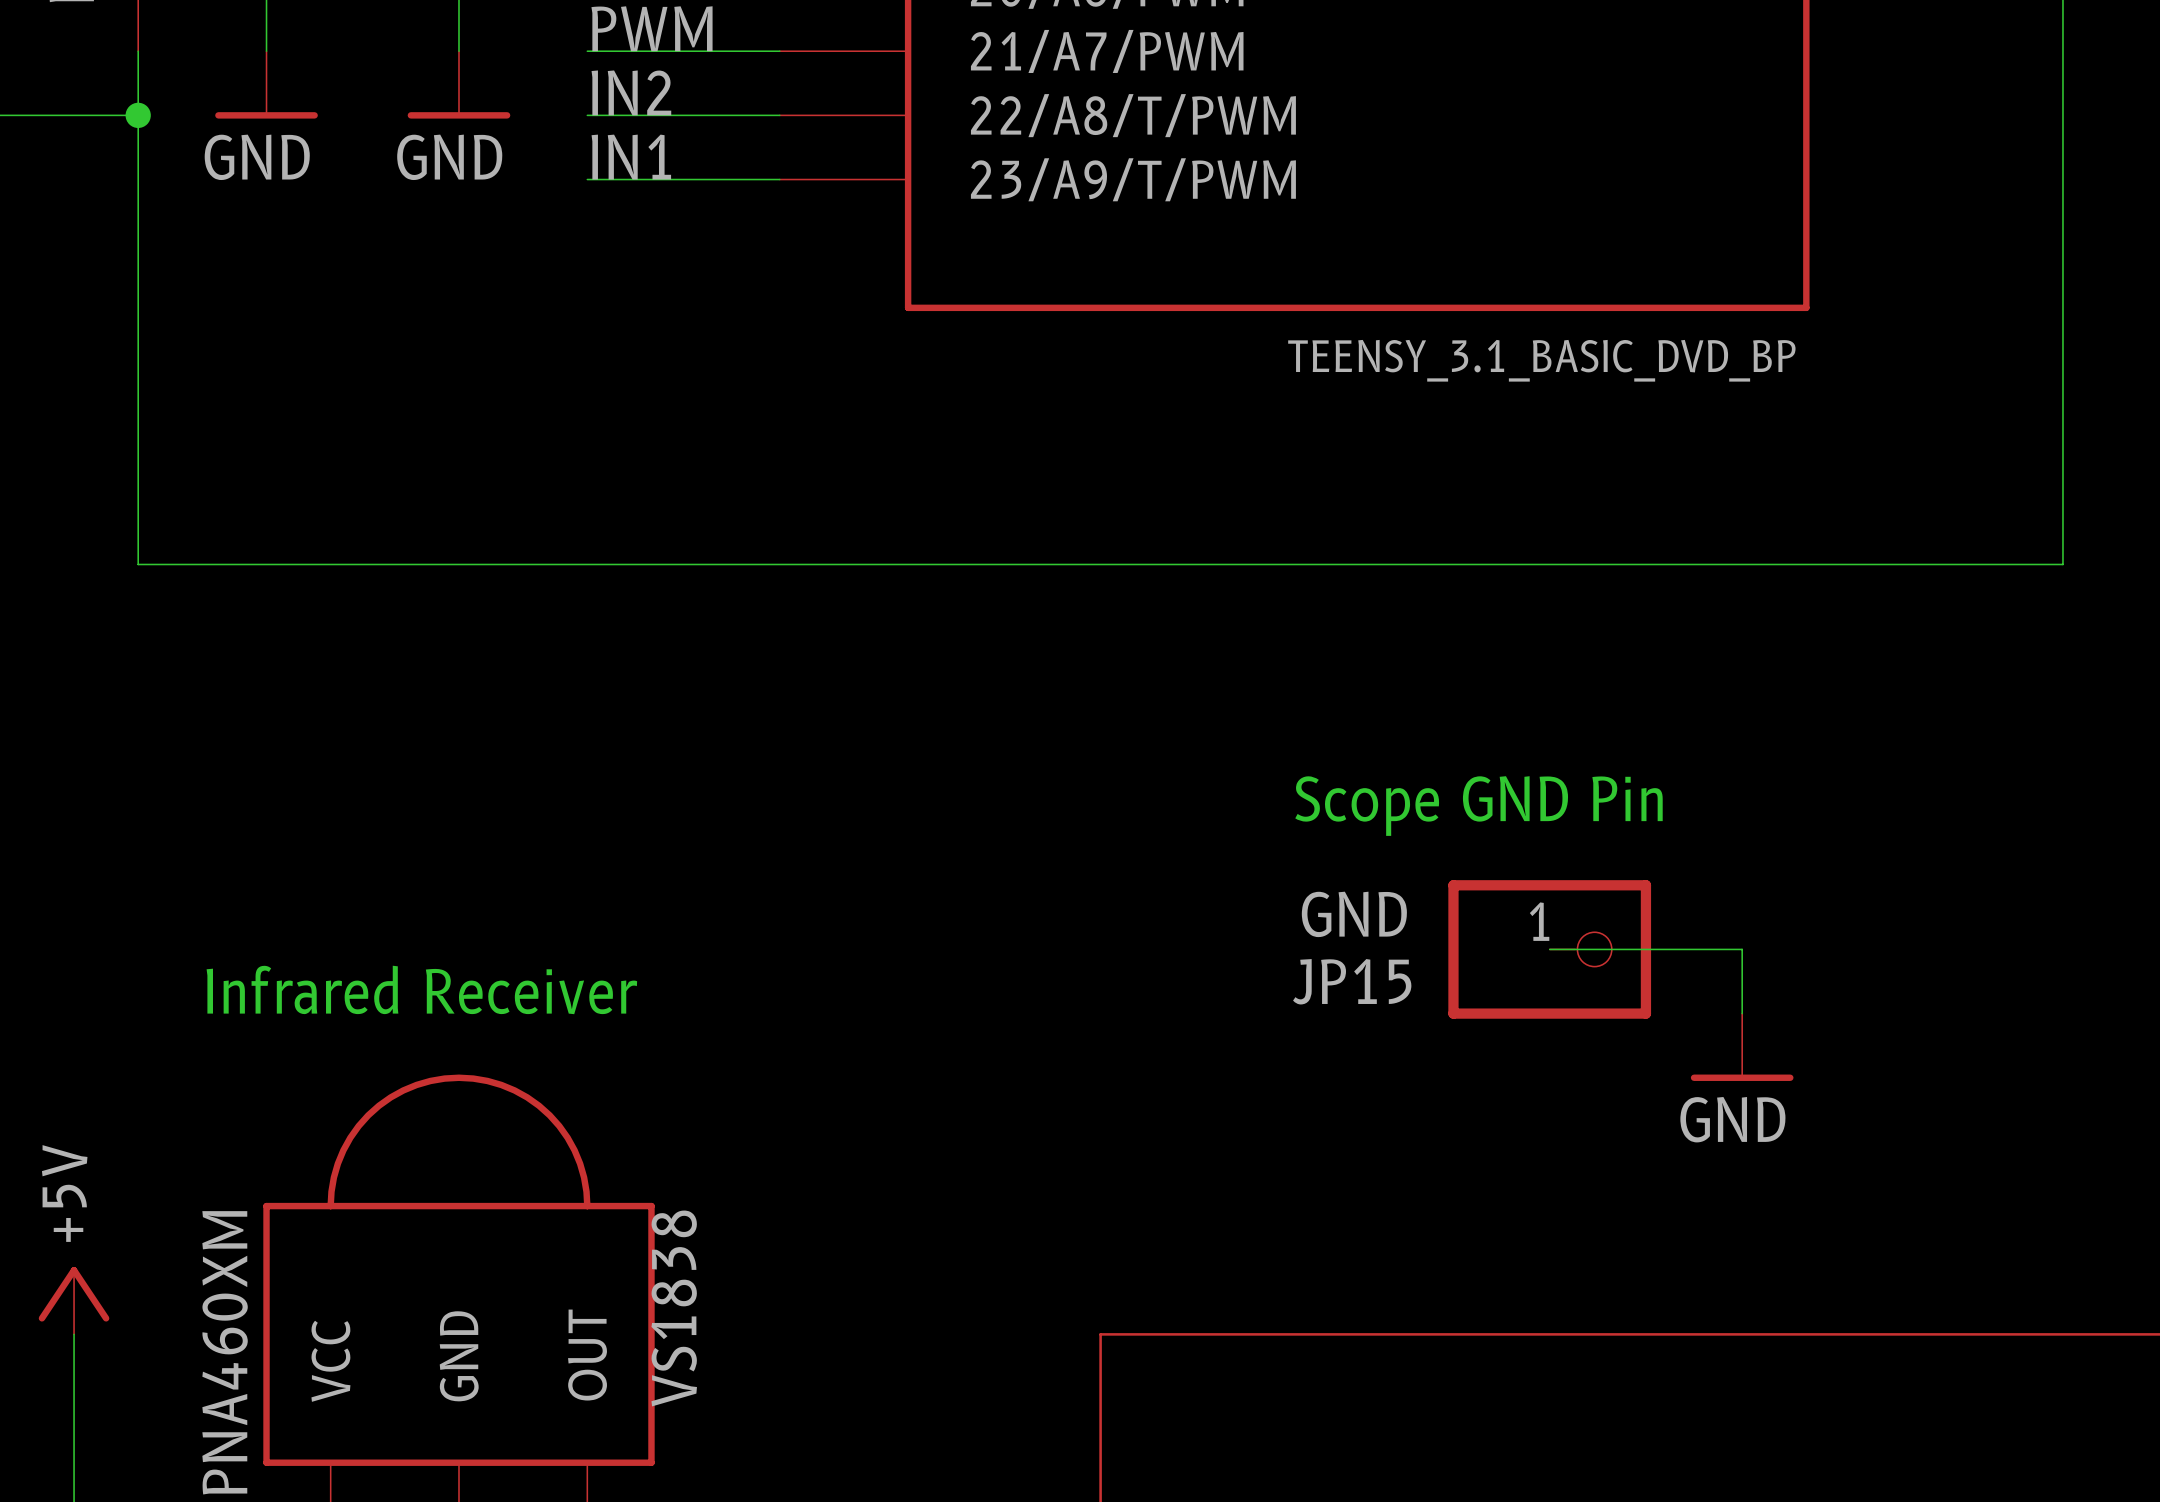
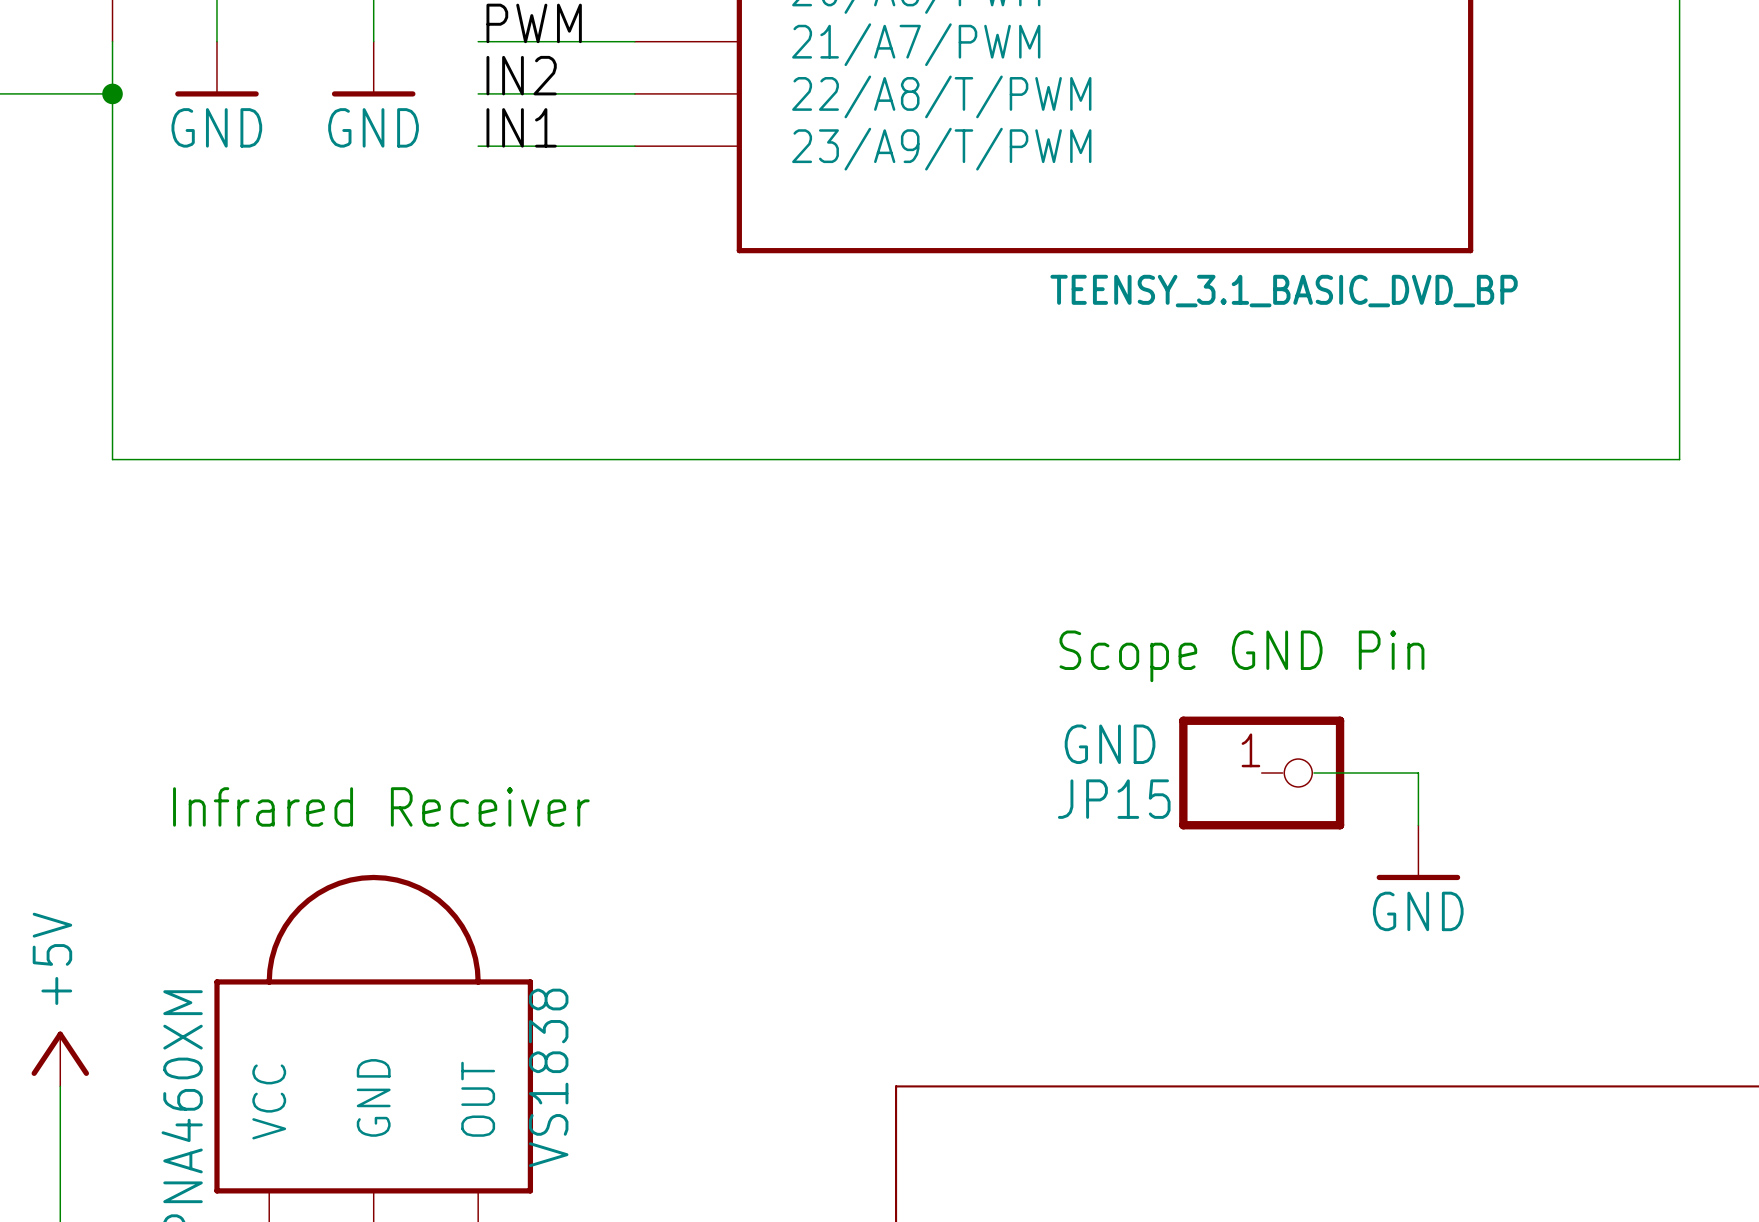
wire: (1549, 949) (1613, 949) -> none

